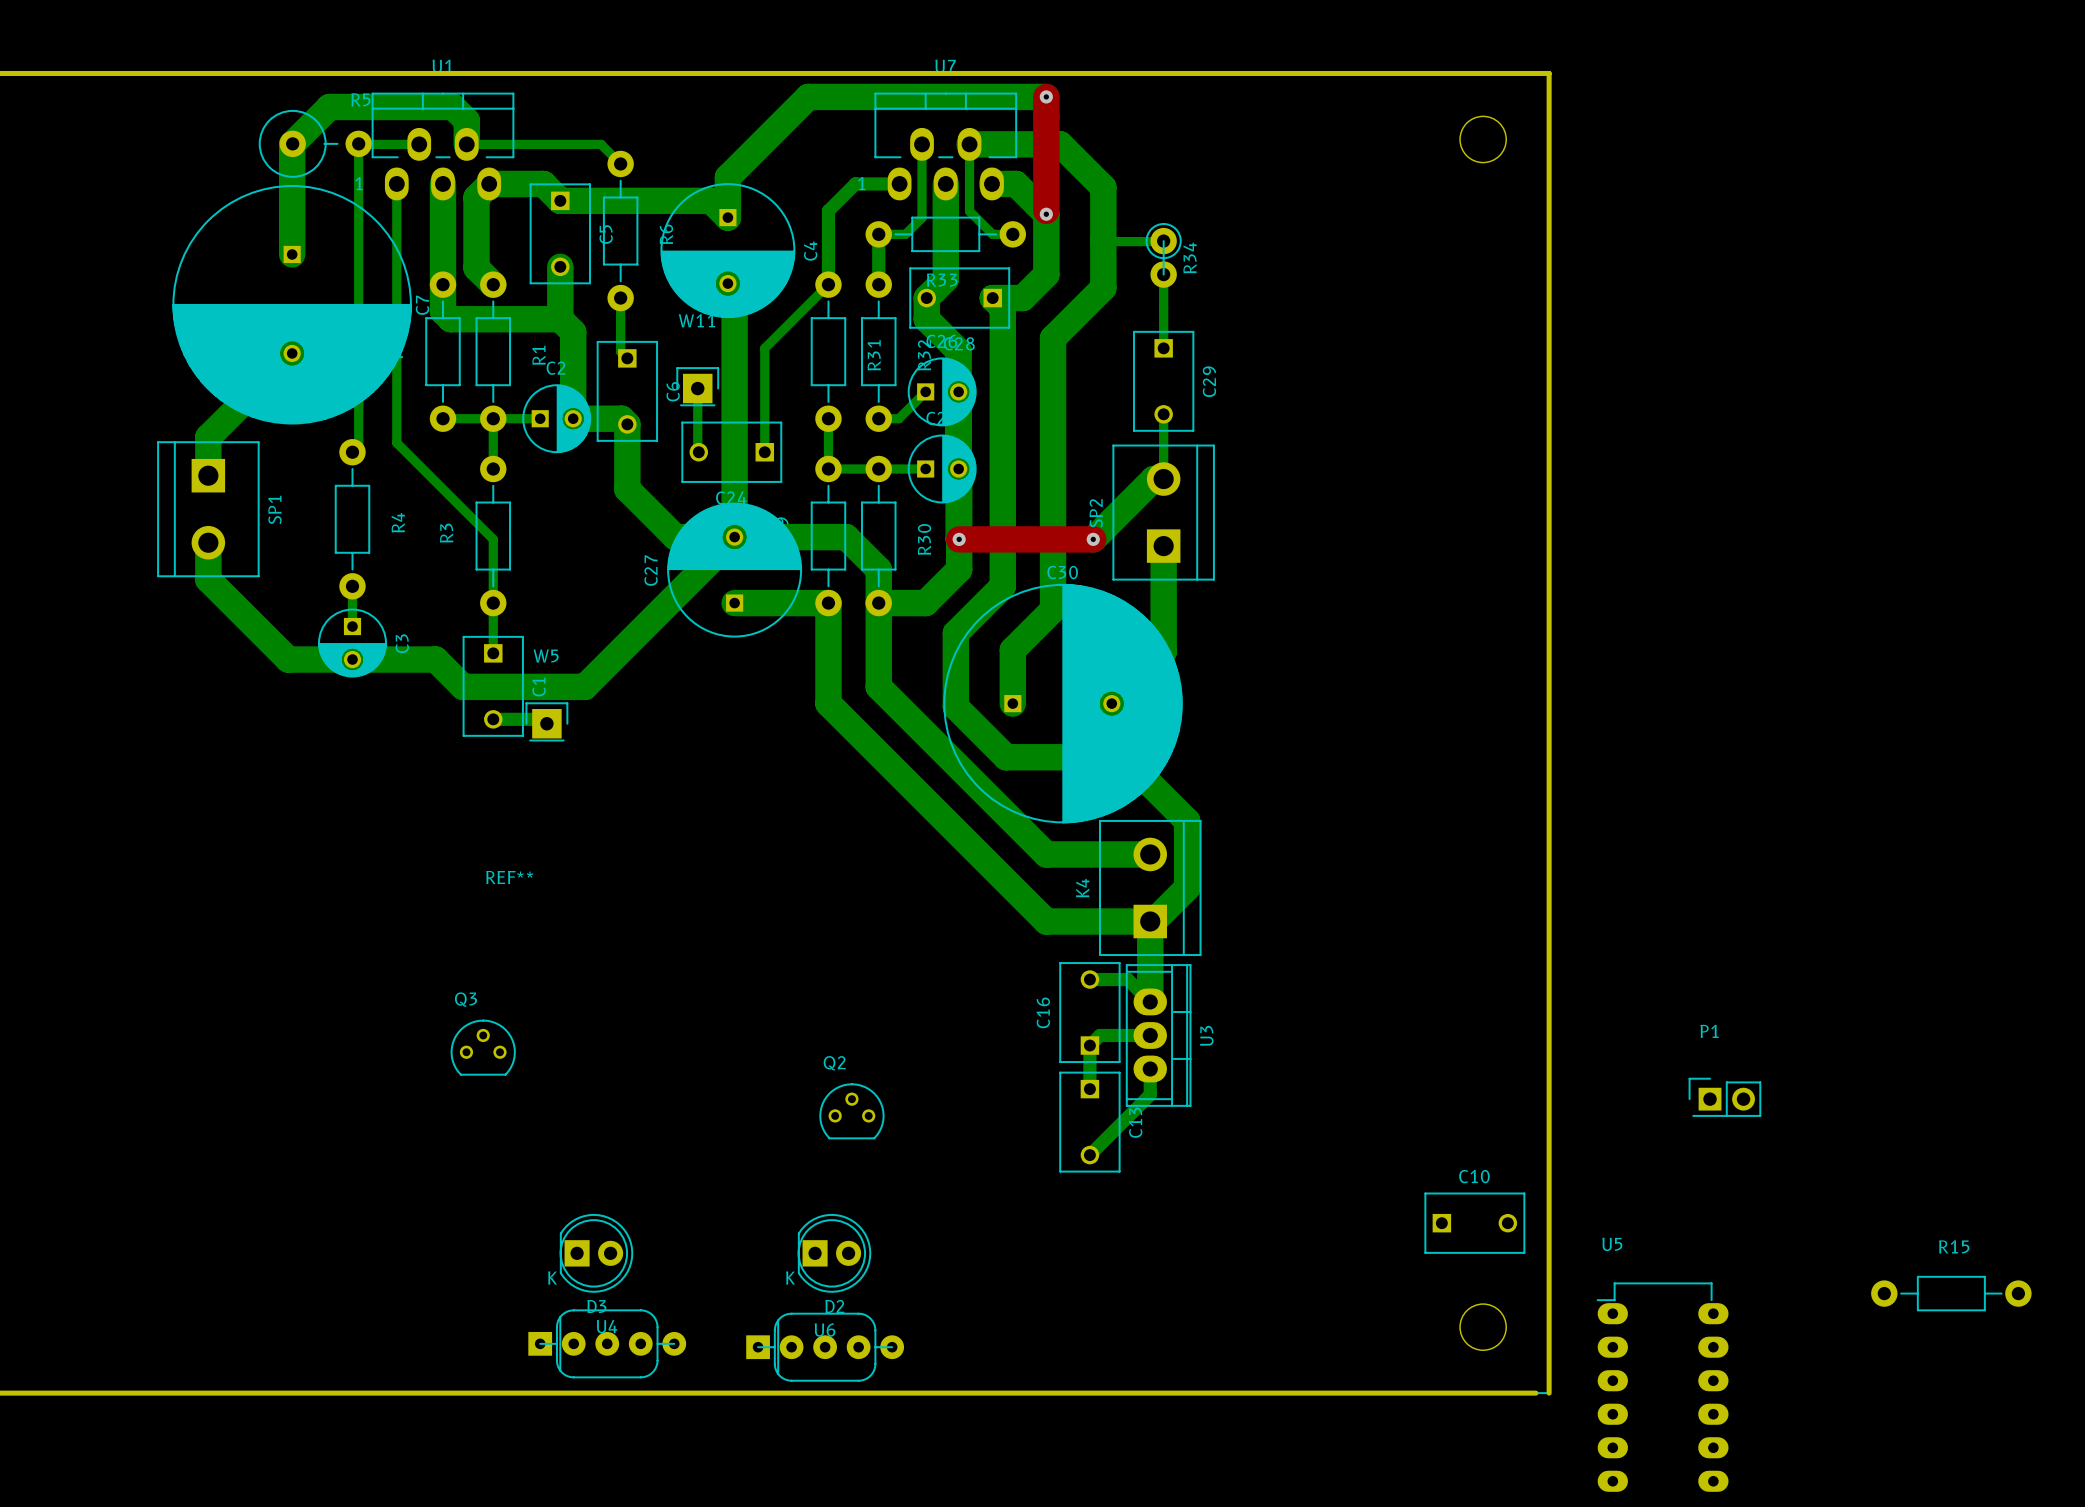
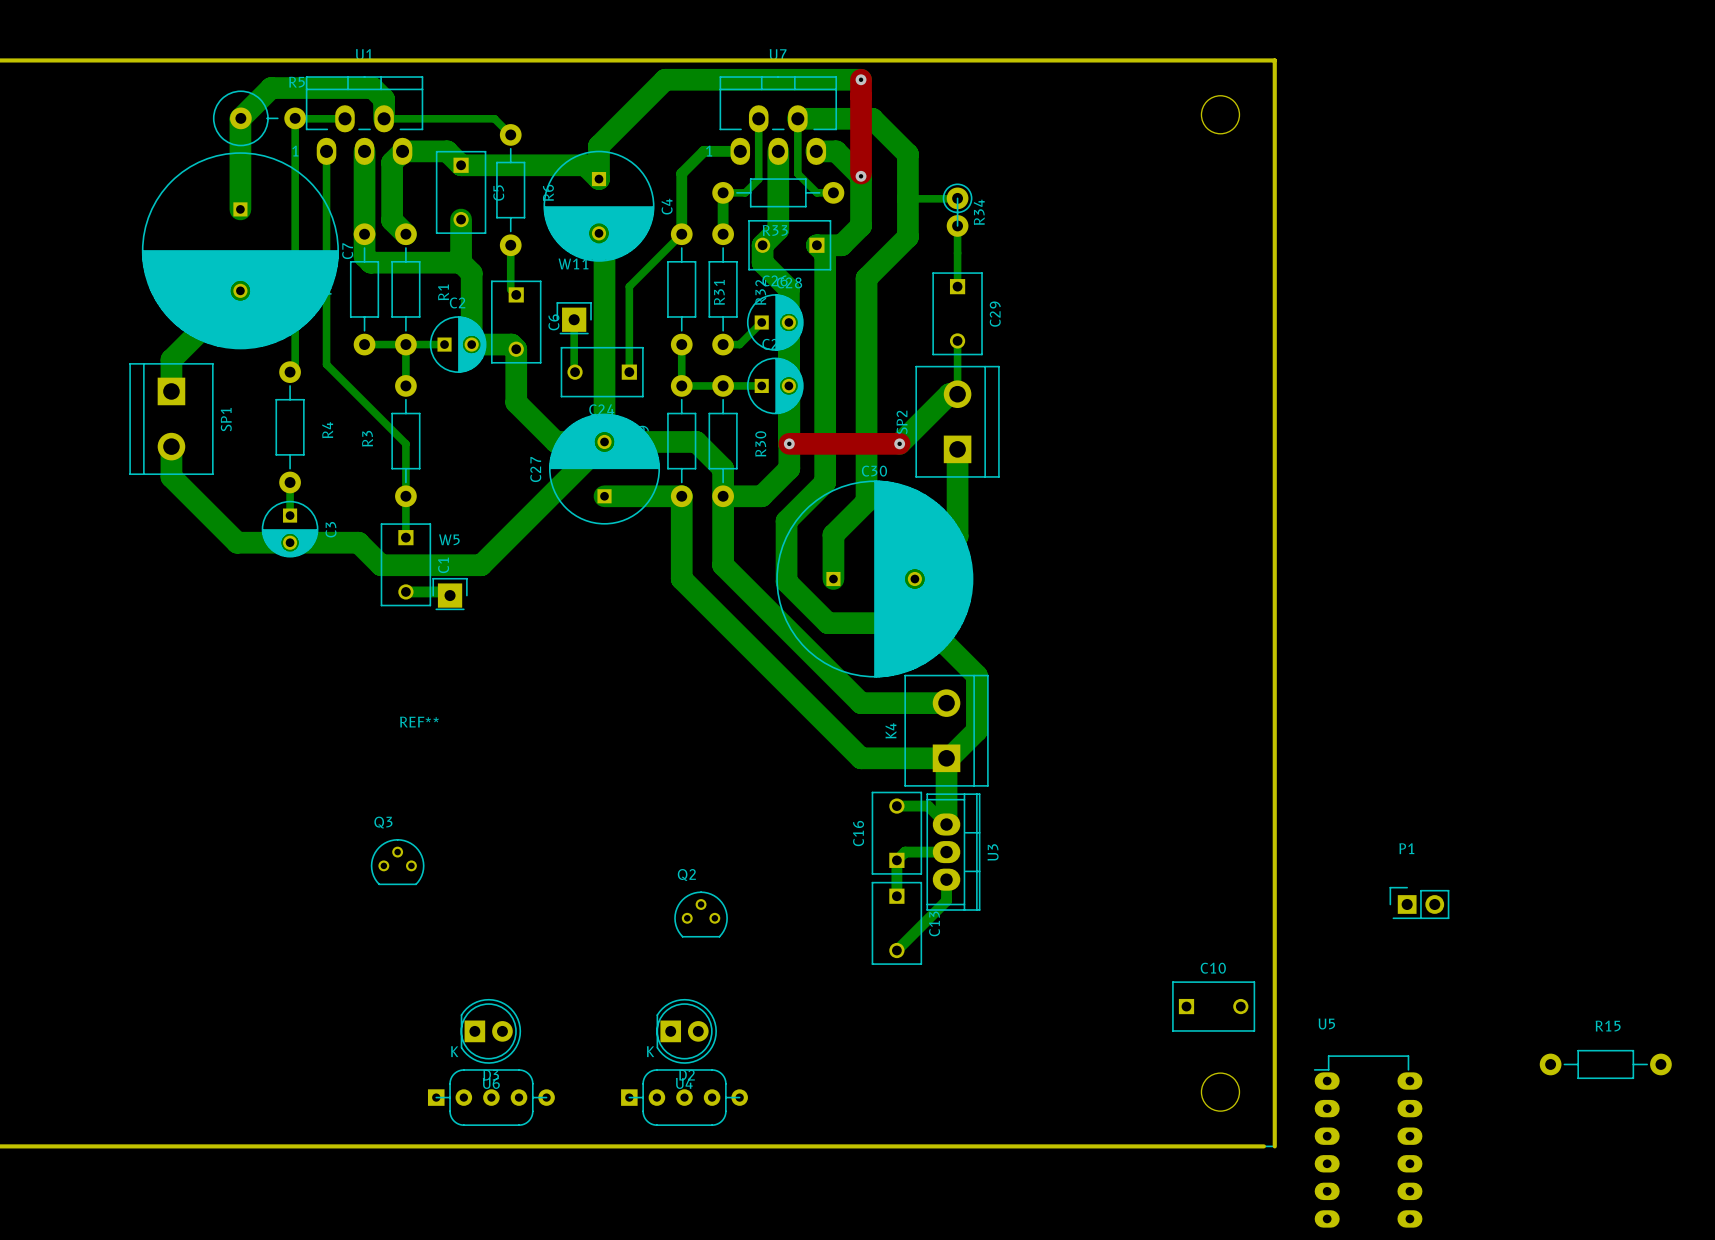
U4 footprint: [528, 1309, 687, 1379] -> [621, 1069, 748, 1126]
U6 footprint: [746, 1312, 905, 1382] -> [427, 1069, 555, 1126]

